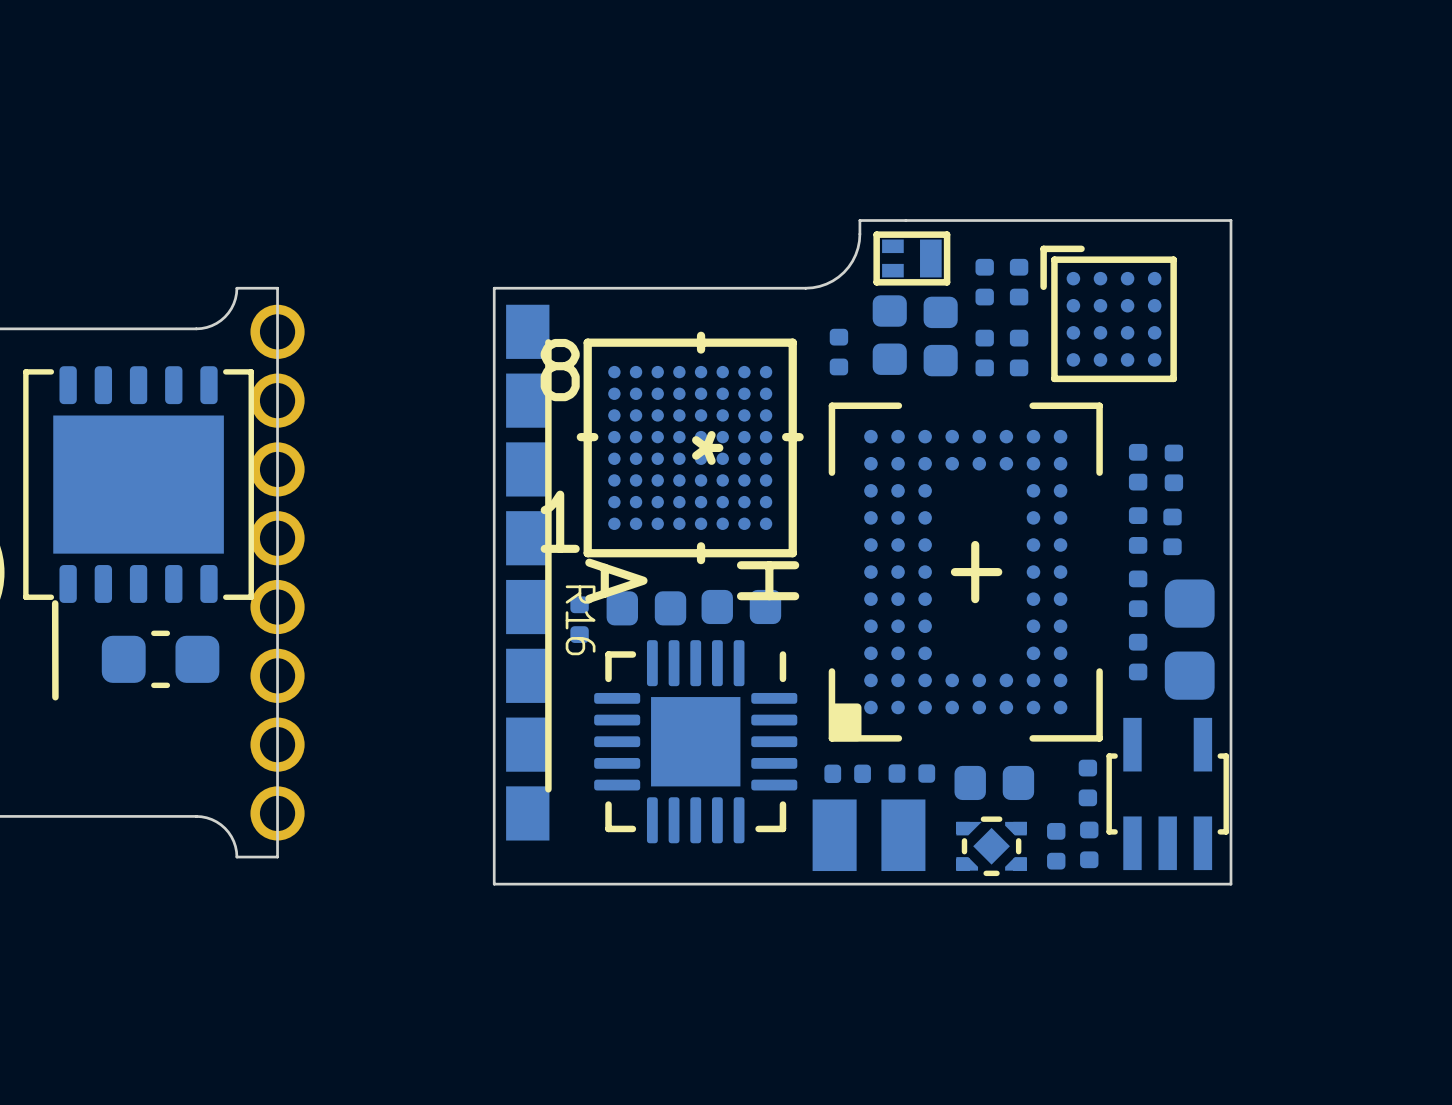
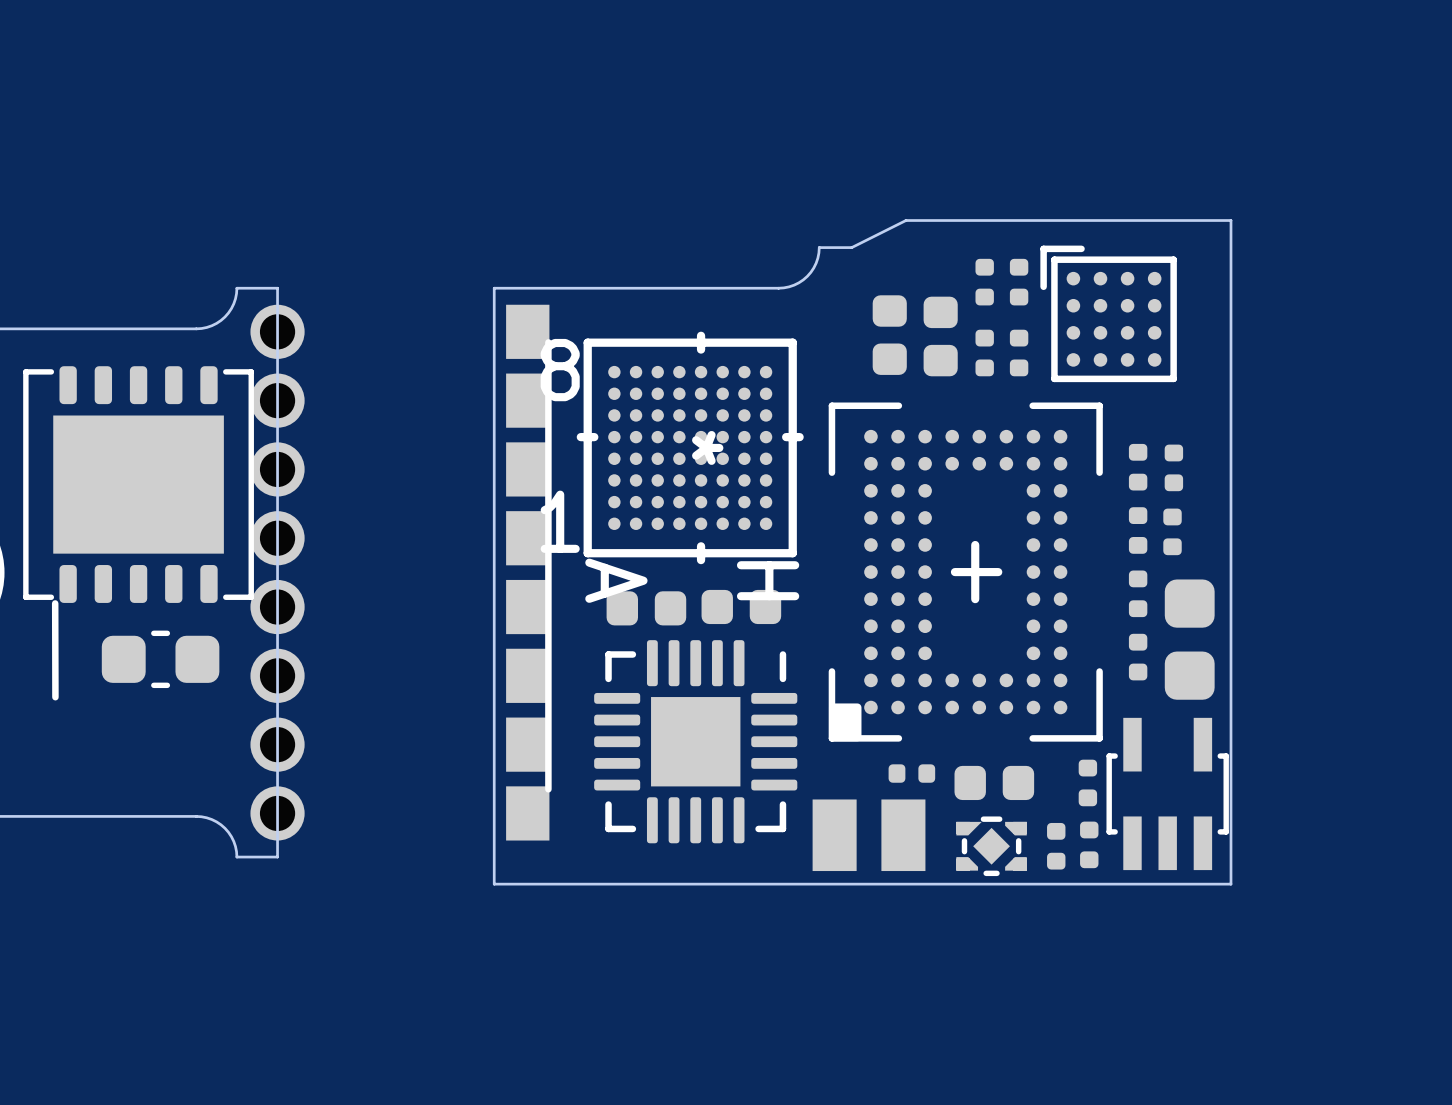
board edge: (905, 220) (859, 220) (859, 241) (855, 254) (848, 267) (838, 277) (826, 284) (812, 287) (778, 288) -> (905, 220) (851, 247) (819, 247) (816, 263) (807, 276) (794, 285) (778, 288)
part: (911, 258) -> none
part: (838, 352) -> none
R16: (579, 619) -> none
part: (847, 773) -> none

